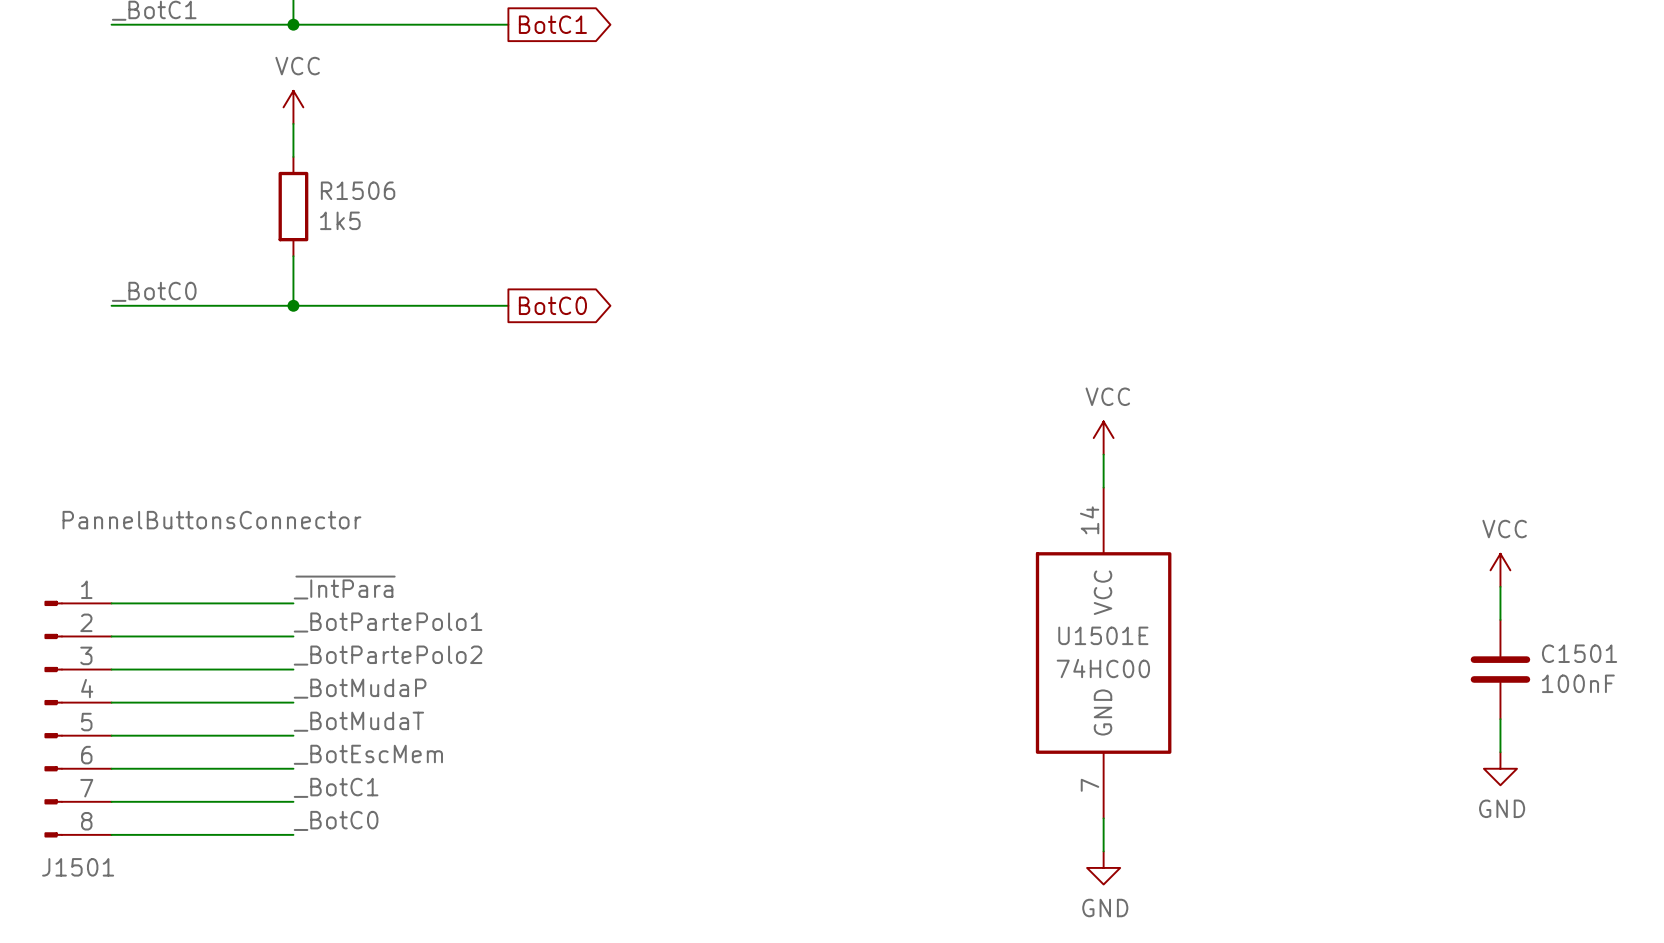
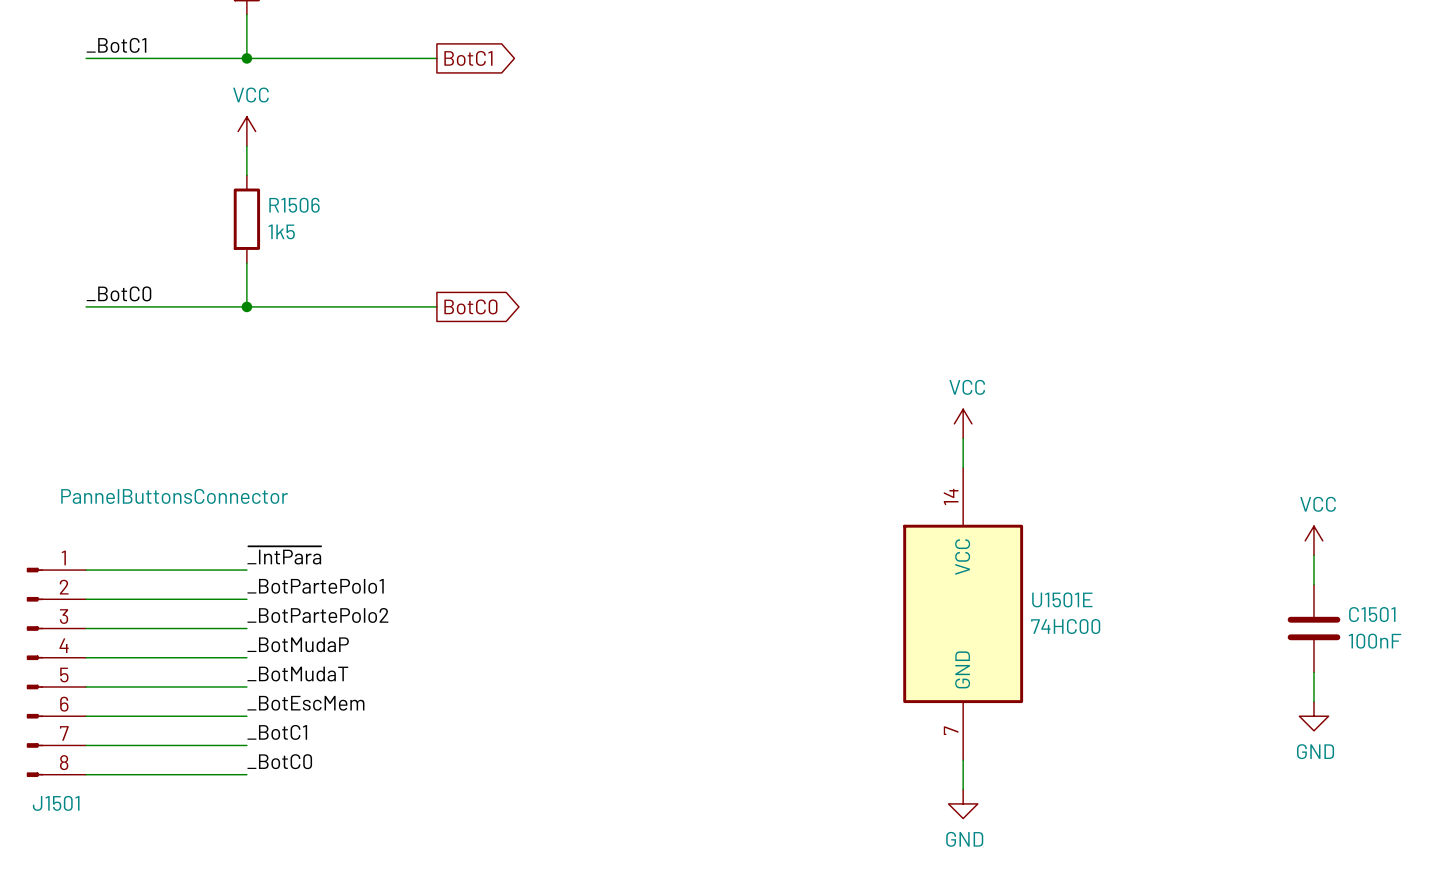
U1501E name position: U1501E (1103, 635) -> U1501E (1062, 599)
U1501E value position: 74HC00 (1103, 668) -> 74HC00 (1065, 626)

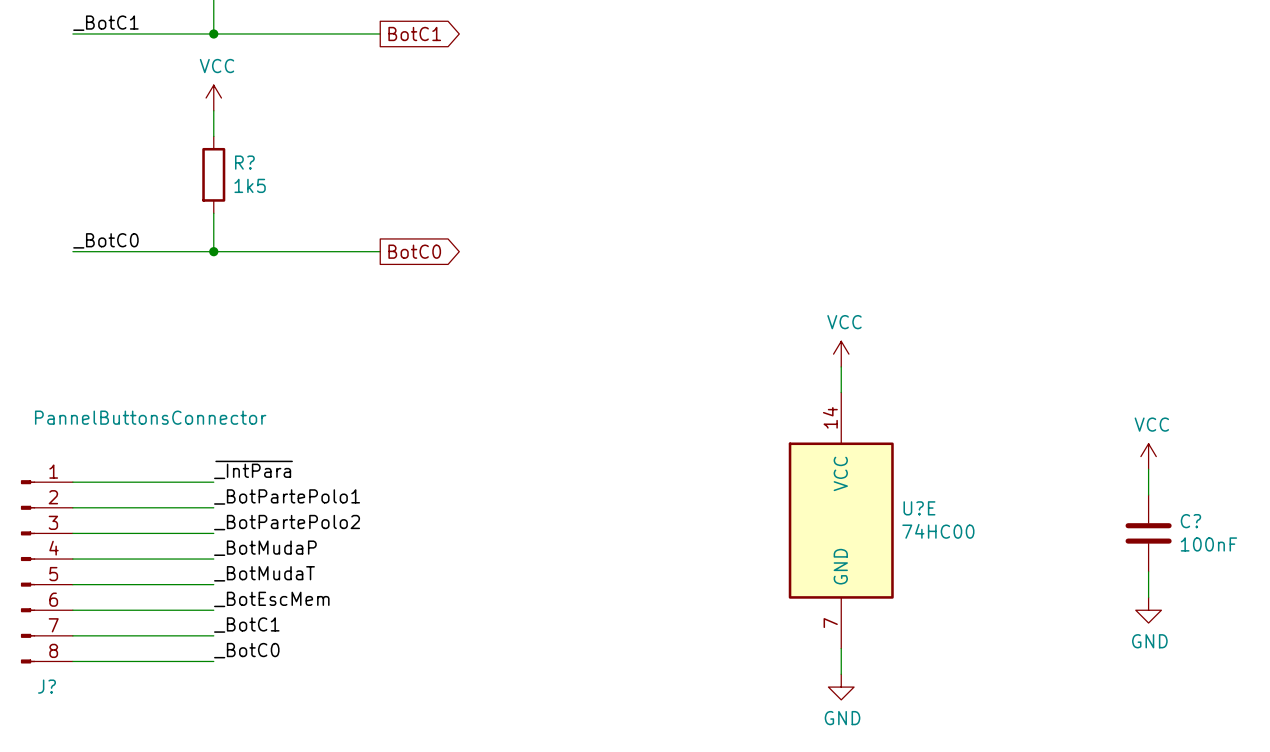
R1506 name: R1506 (294, 205) -> R? (244, 162)
U1501E name: U1501E (1062, 599) -> U?E (919, 508)
C1501 name: C1501 (1372, 614) -> C? (1190, 521)
J1501 name: J1501 (56, 803) -> J? (46, 686)

